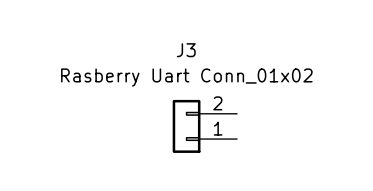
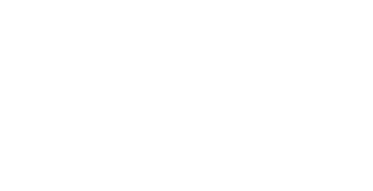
J3: Rasberry Uart Conn_01x02 (204, 126) -> none

